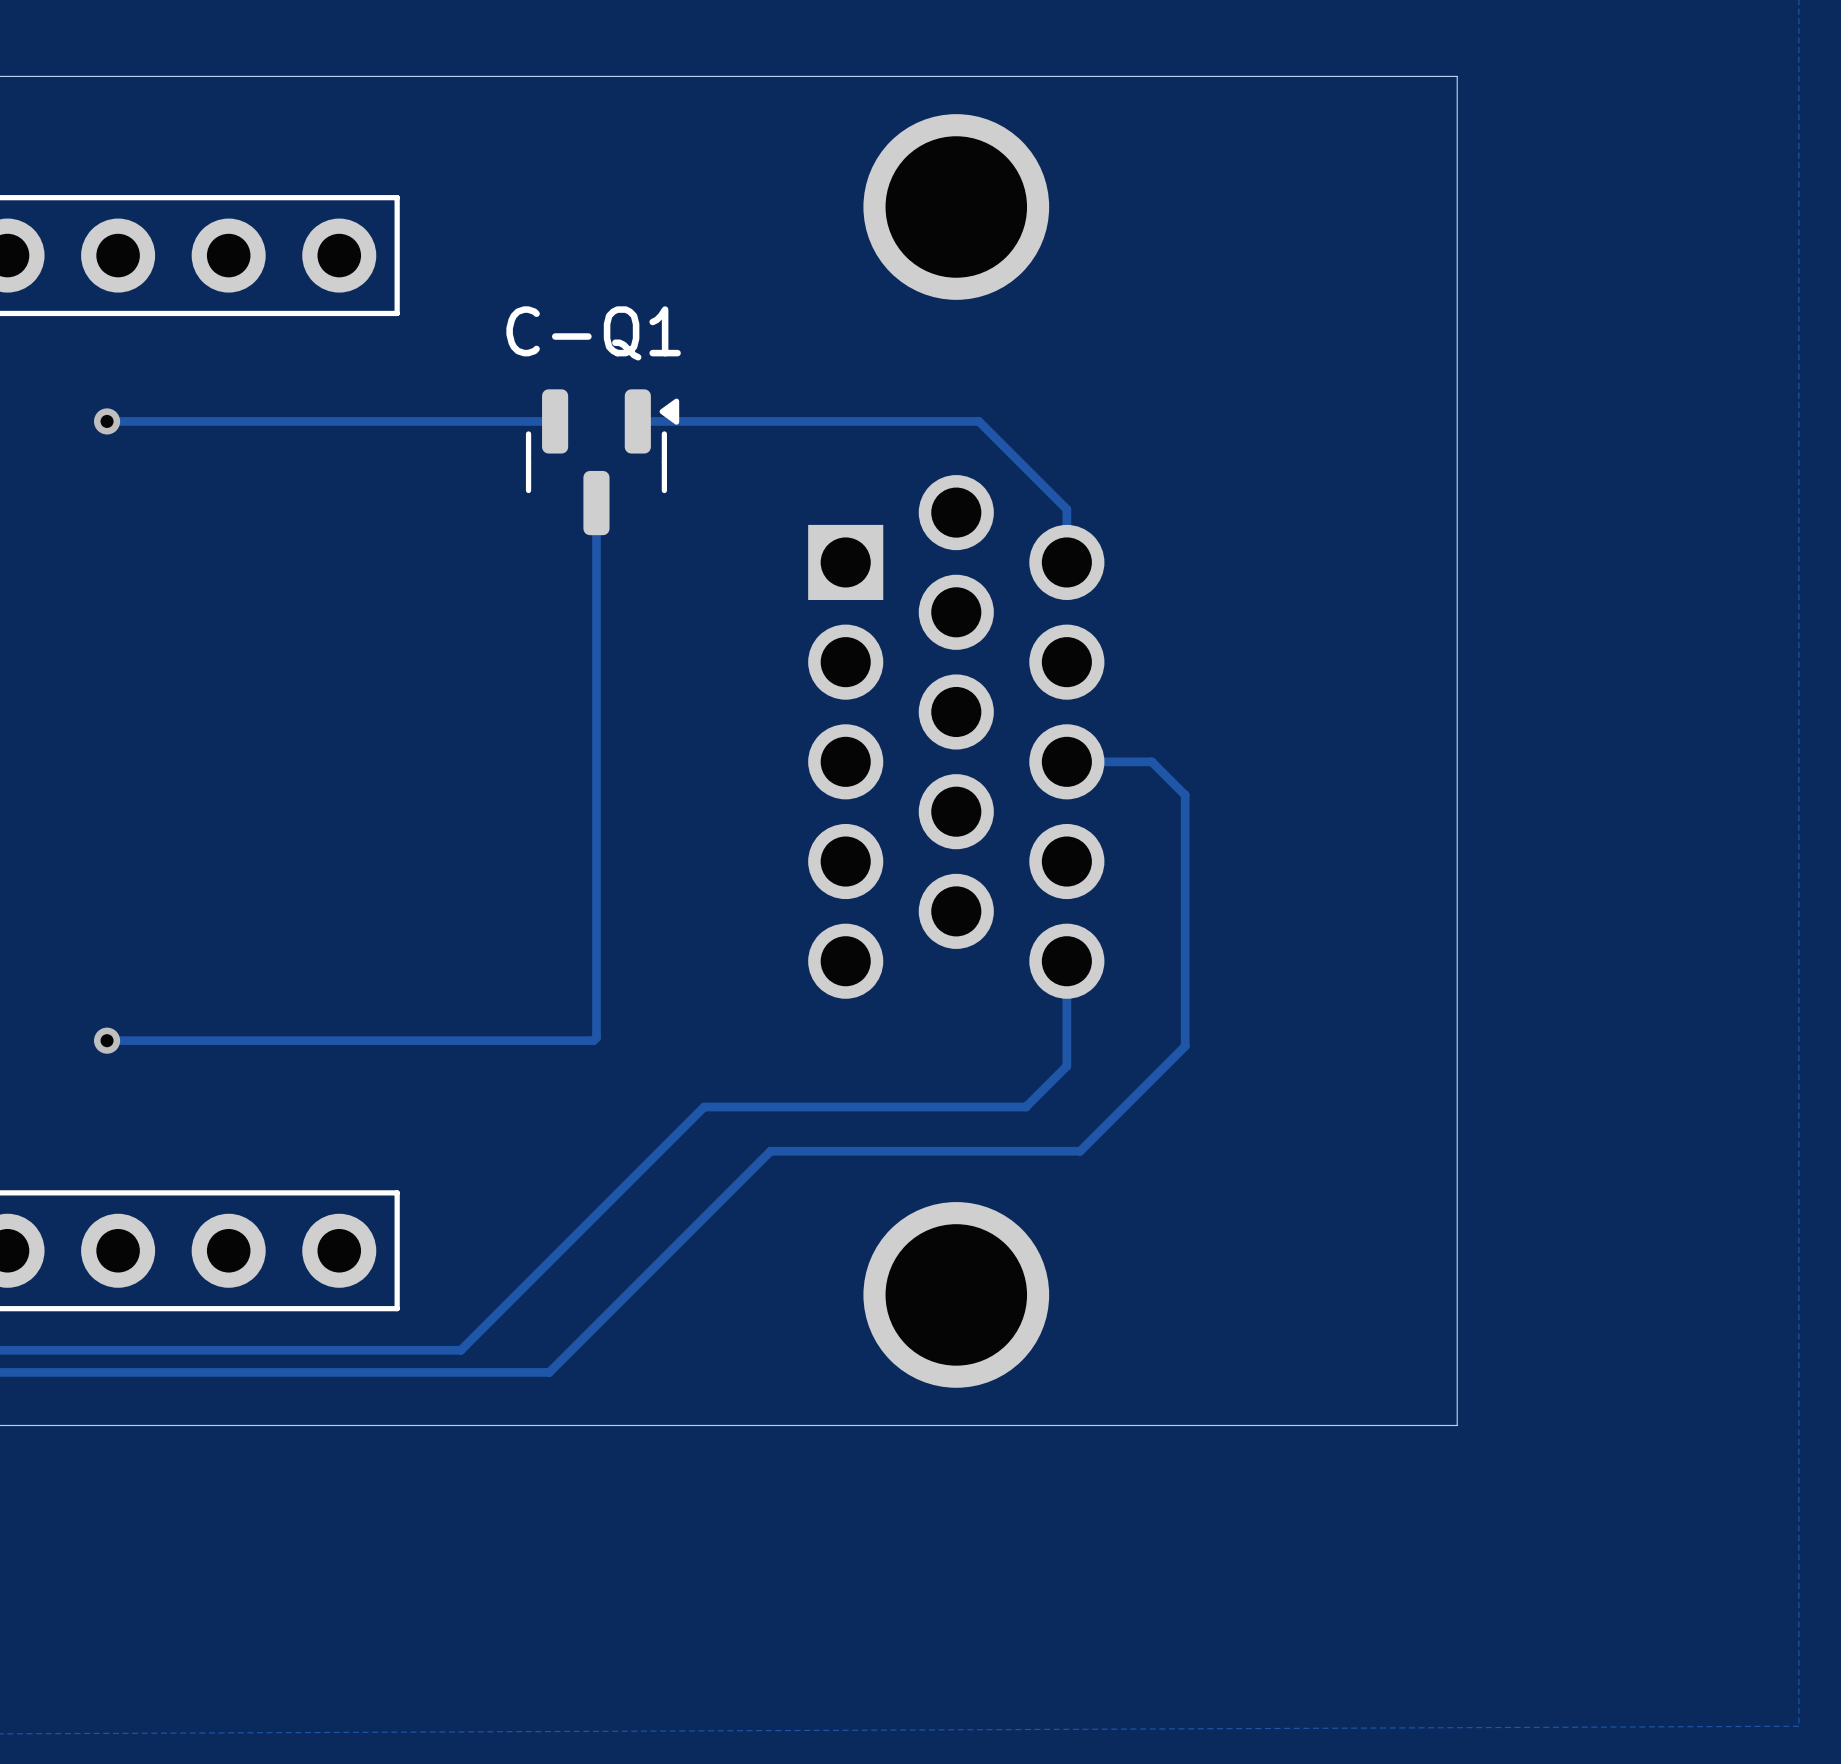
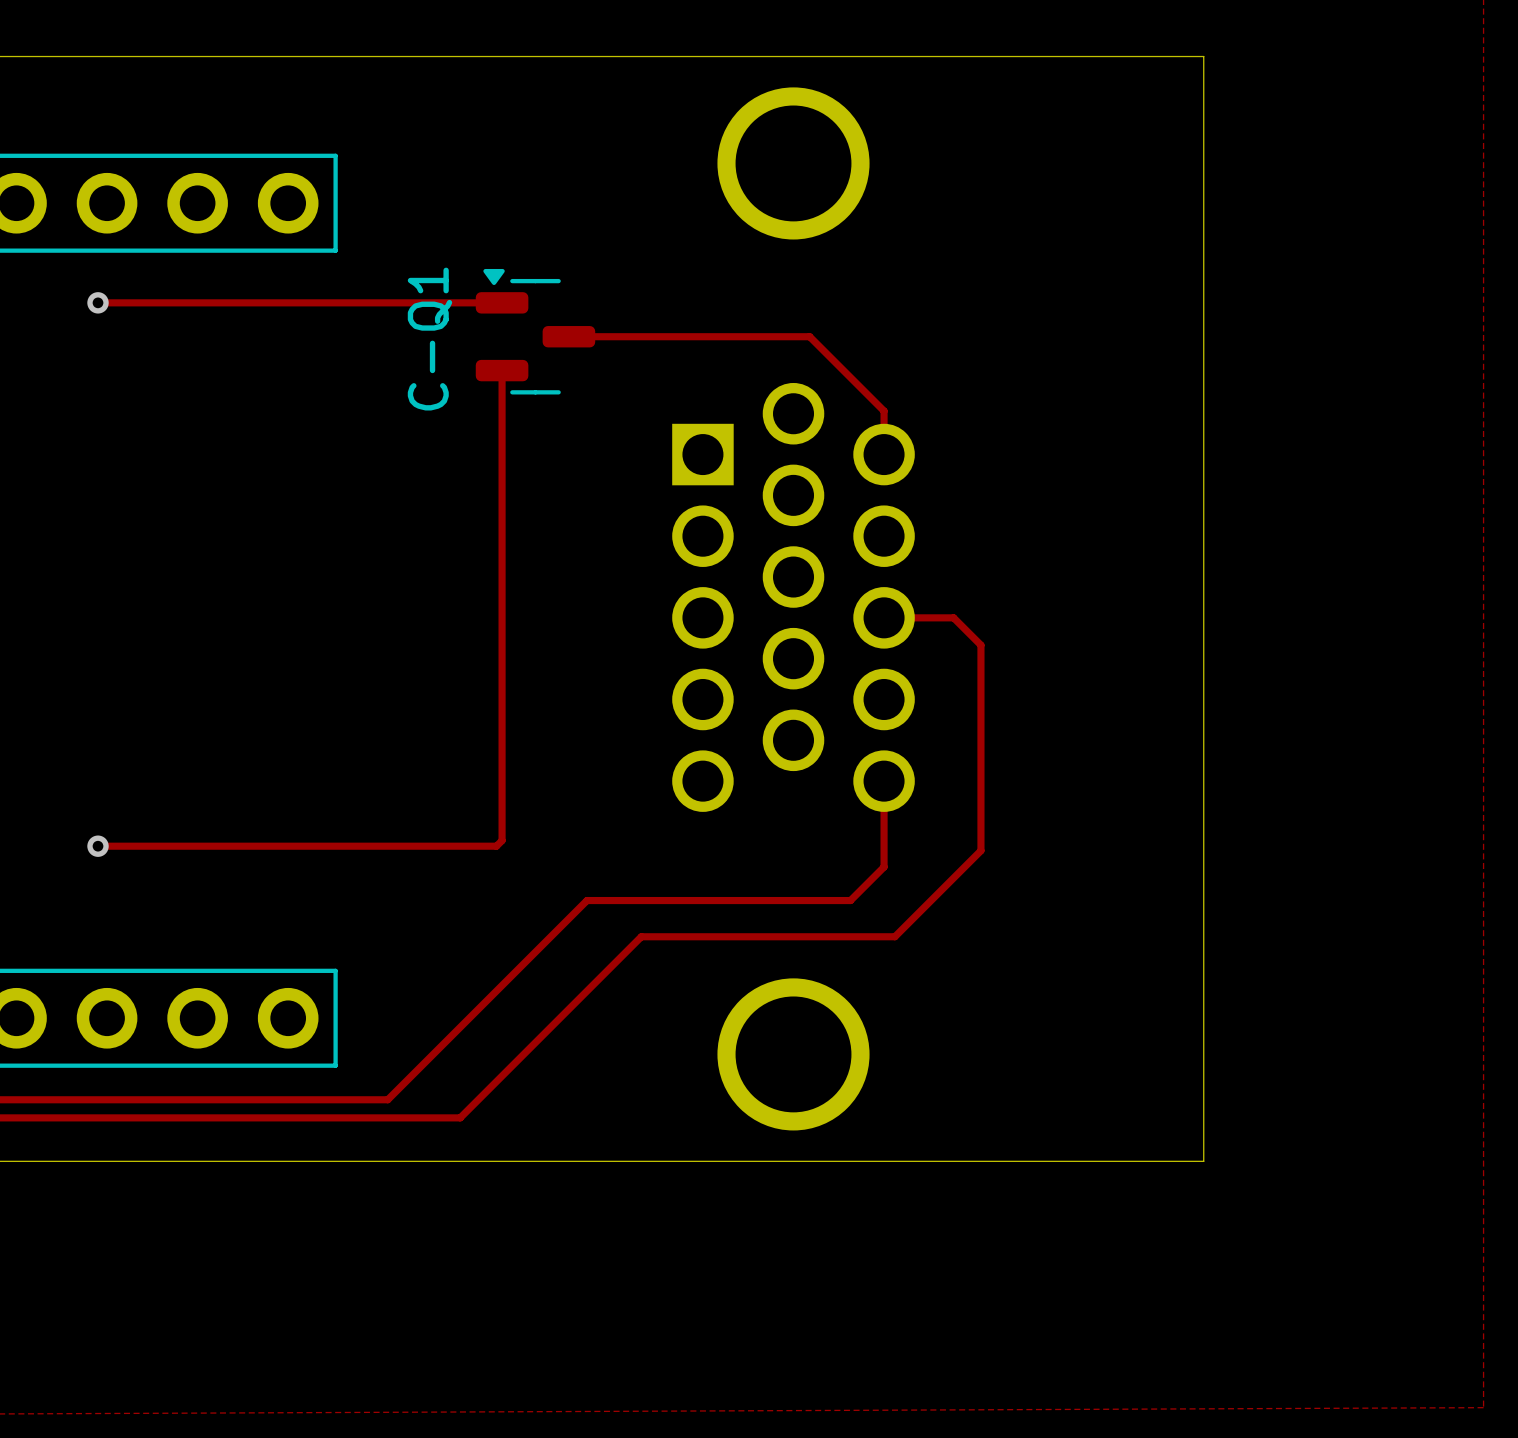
track: none -> (98, 302) (502, 302)
track: (107, 421) (555, 421) -> none
via position: (107, 421) -> (98, 302)
track: (637, 421) (978, 421) -> (568, 336) (809, 336) (812, 339)
C-Q1 rotation: 0° (602, 462) -> 90° counterclockwise (535, 331)
track: (596, 503) (596, 1037) -> (502, 370) (502, 840) (498, 843)

